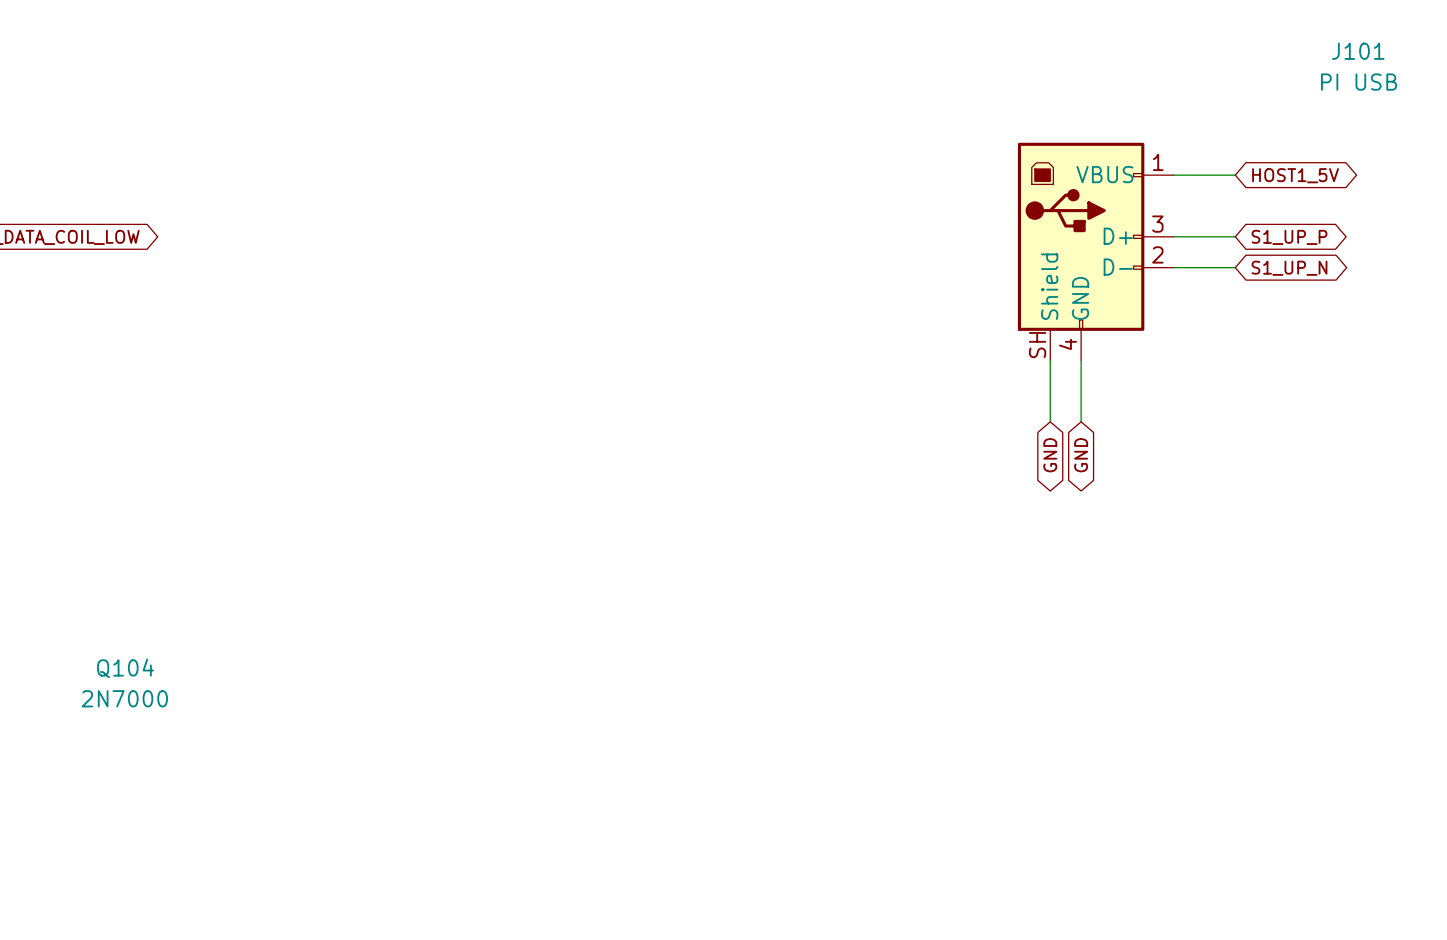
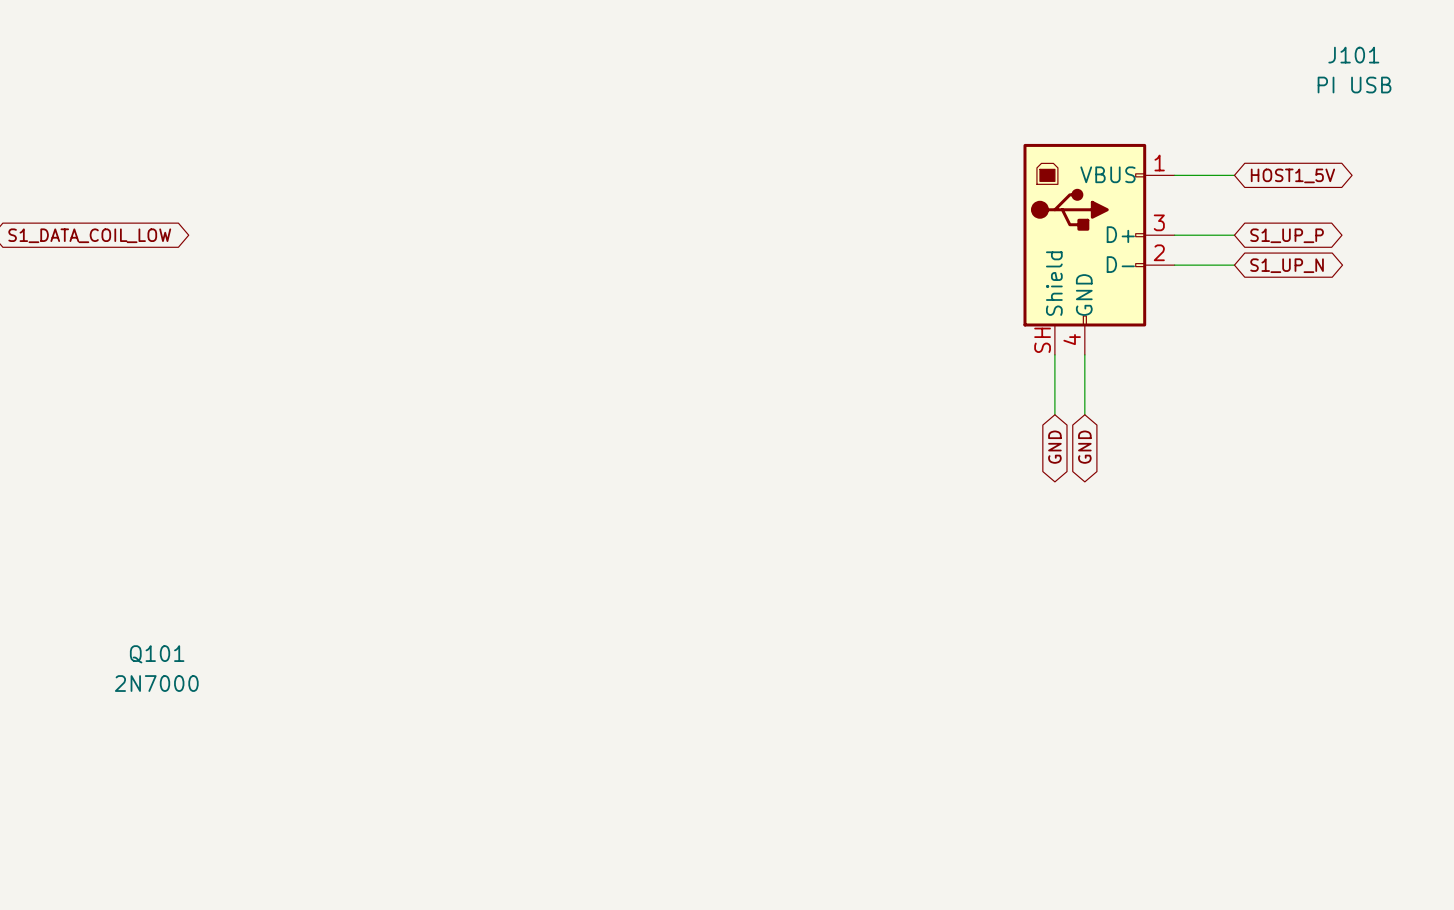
Q104 name: Q104 (125, 668) -> Q101 (157, 654)

